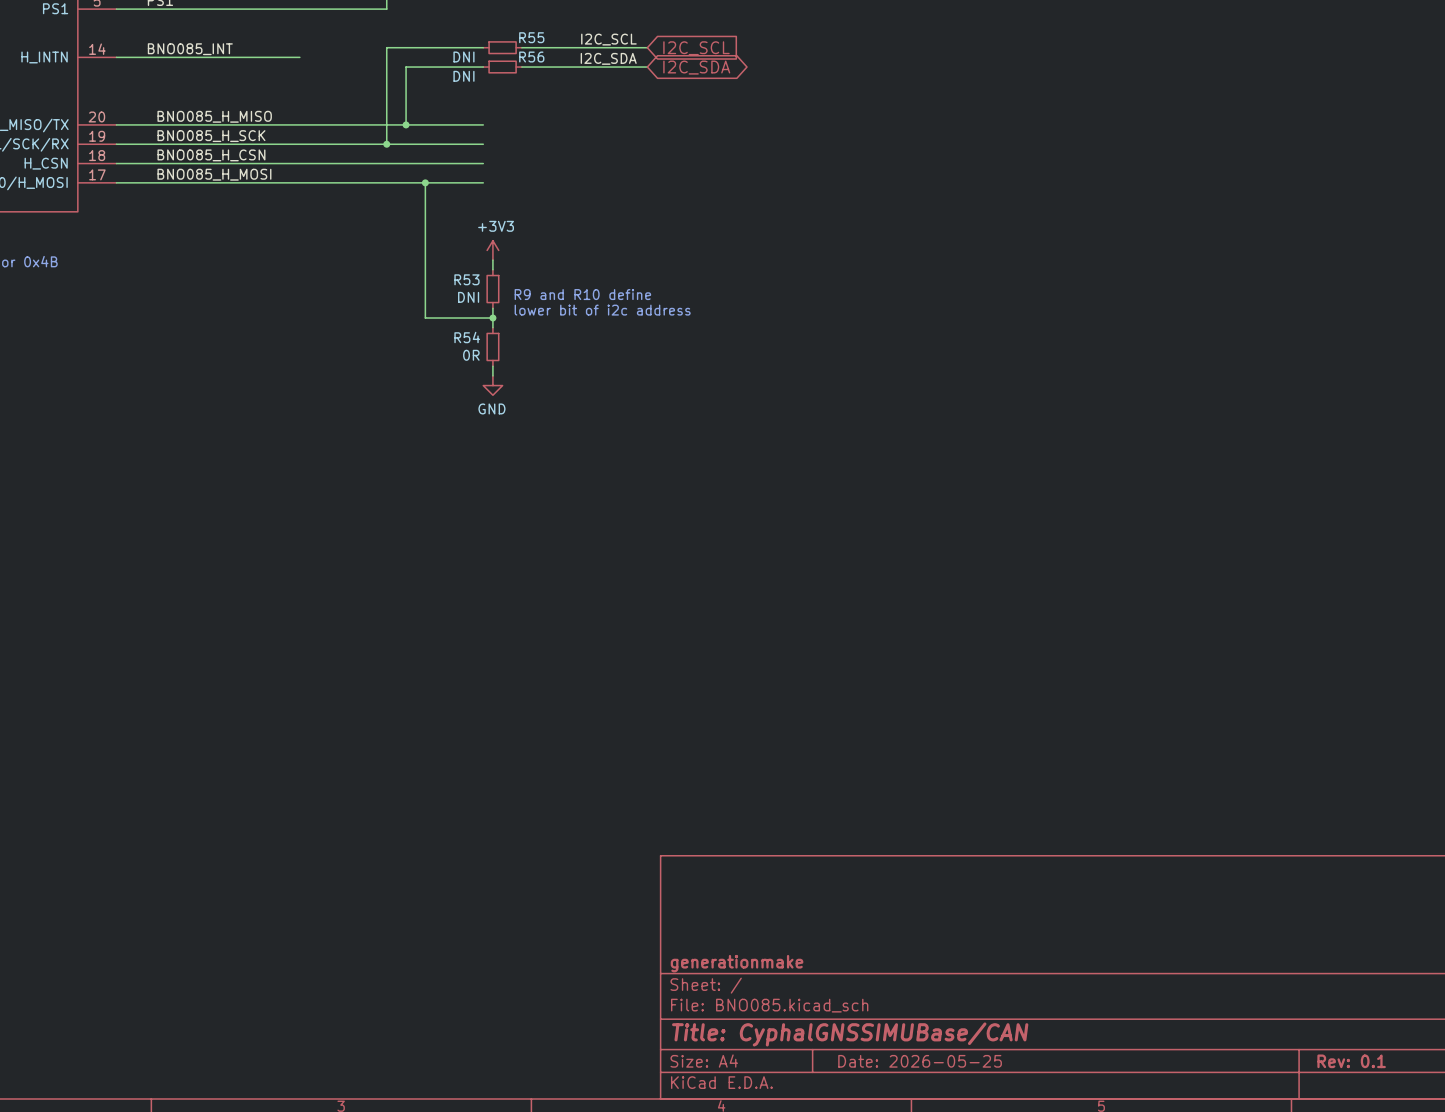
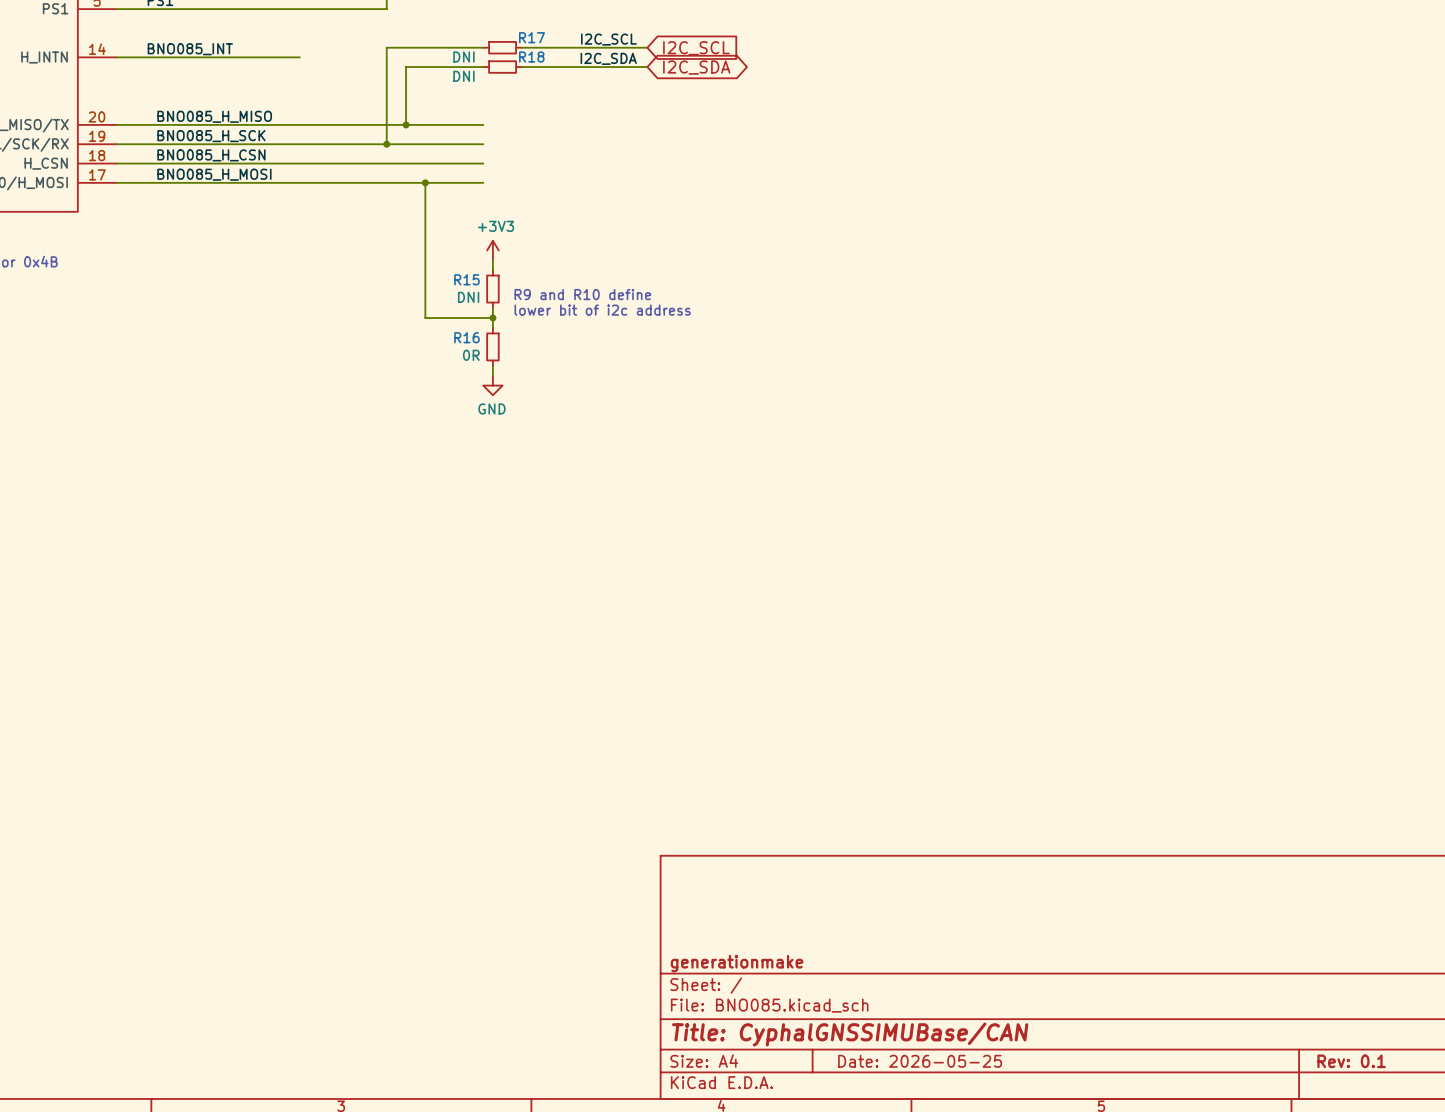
R55 name: R55 (531, 37) -> R17 (532, 37)
R56 name: R56 (531, 57) -> R18 (531, 57)
R53 name: R53 (466, 279) -> R15 (466, 279)
R54 name: R54 (467, 337) -> R16 (466, 337)

